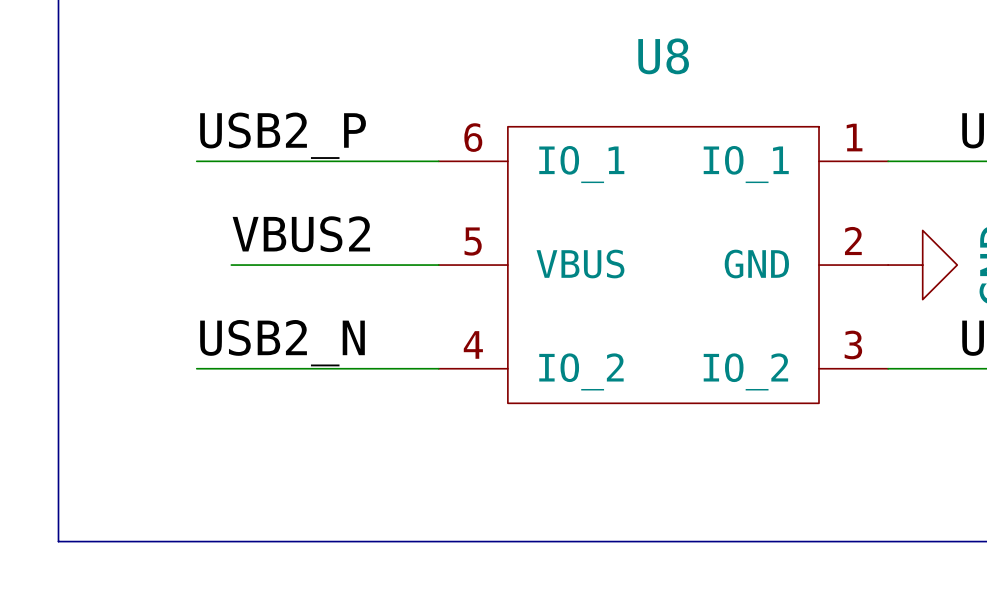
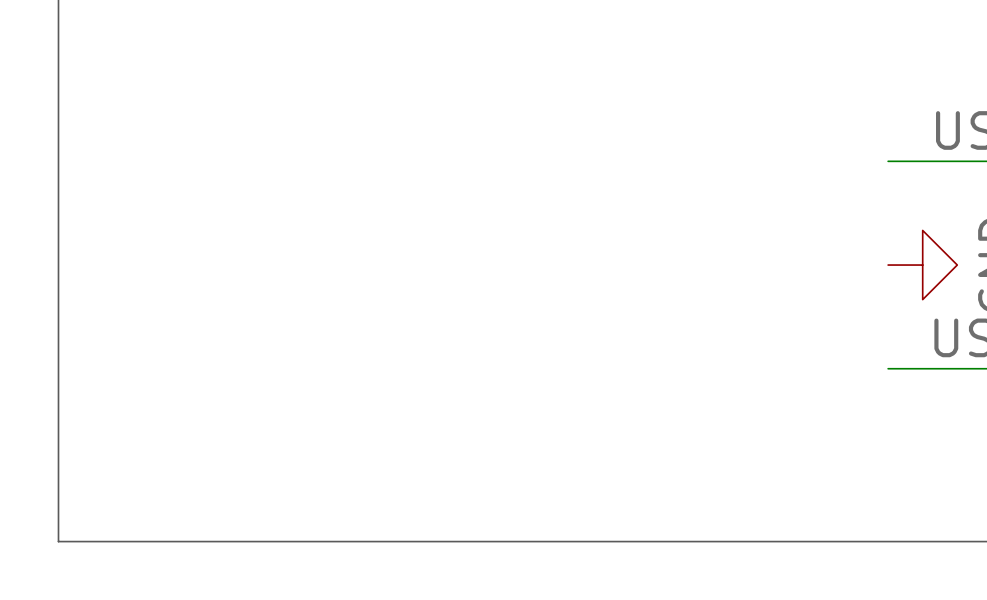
label: USB2_P (283, 135) -> none
wire: (196, 161) (438, 161) -> none
label: VBUS2 (301, 234) -> none
wire: (231, 265) (438, 265) -> none
U8: (663, 265) -> none
label: USB2_N (282, 343) -> none
wire: (196, 368) (438, 368) -> none

